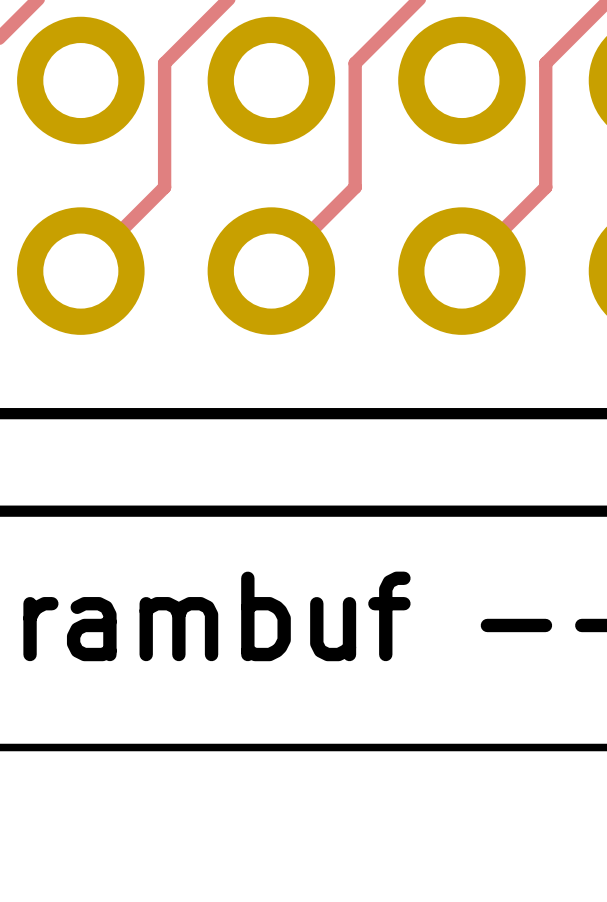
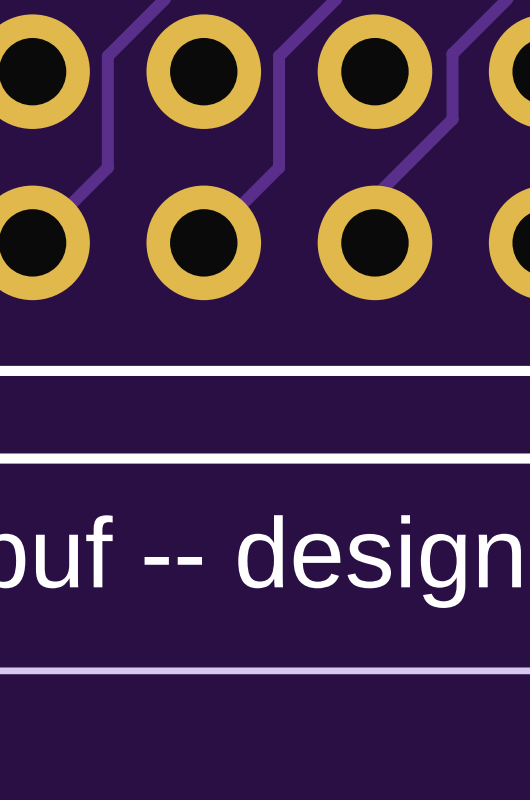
track: (548, 60) (545, 63) (545, 187) (461, 271) -> (452, 53) (452, 119) (374, 196) (374, 242)

